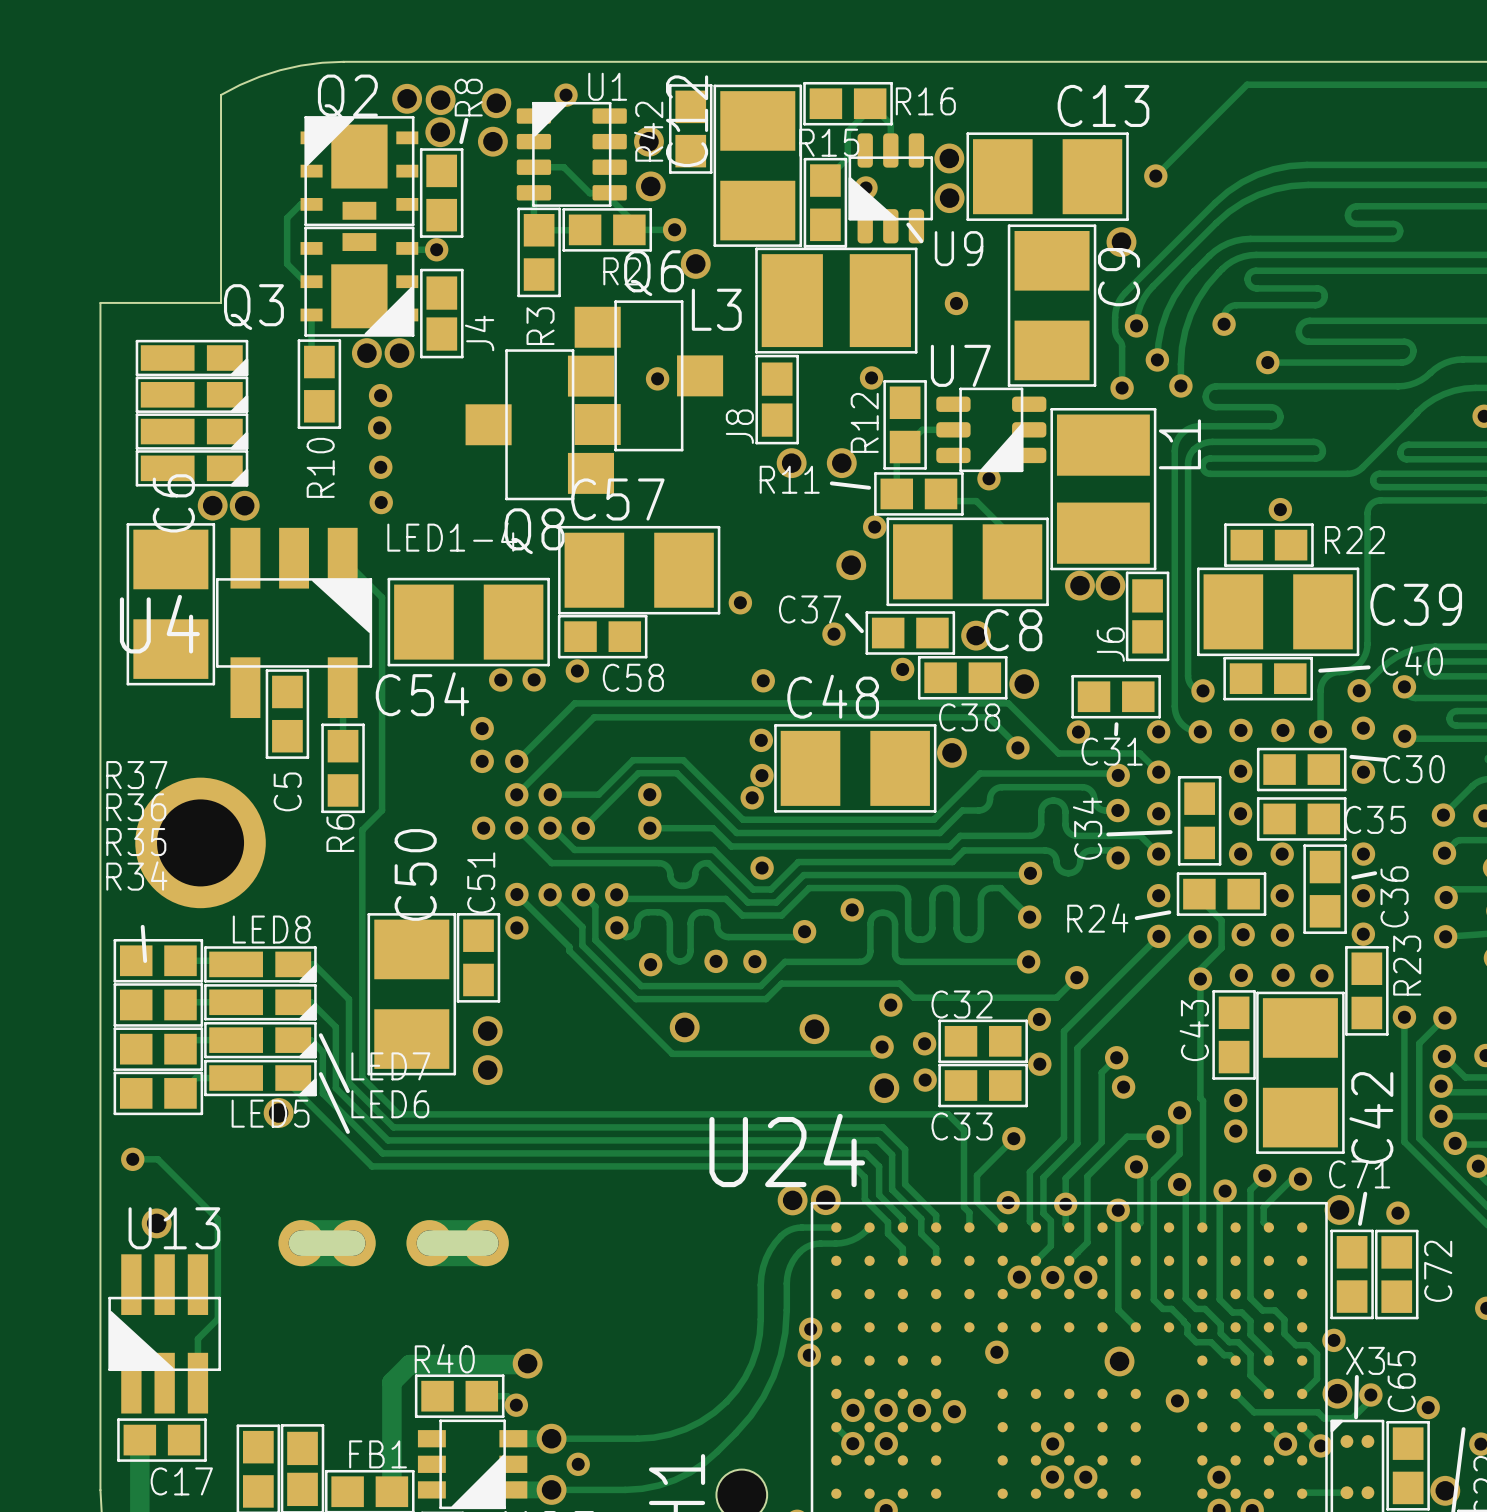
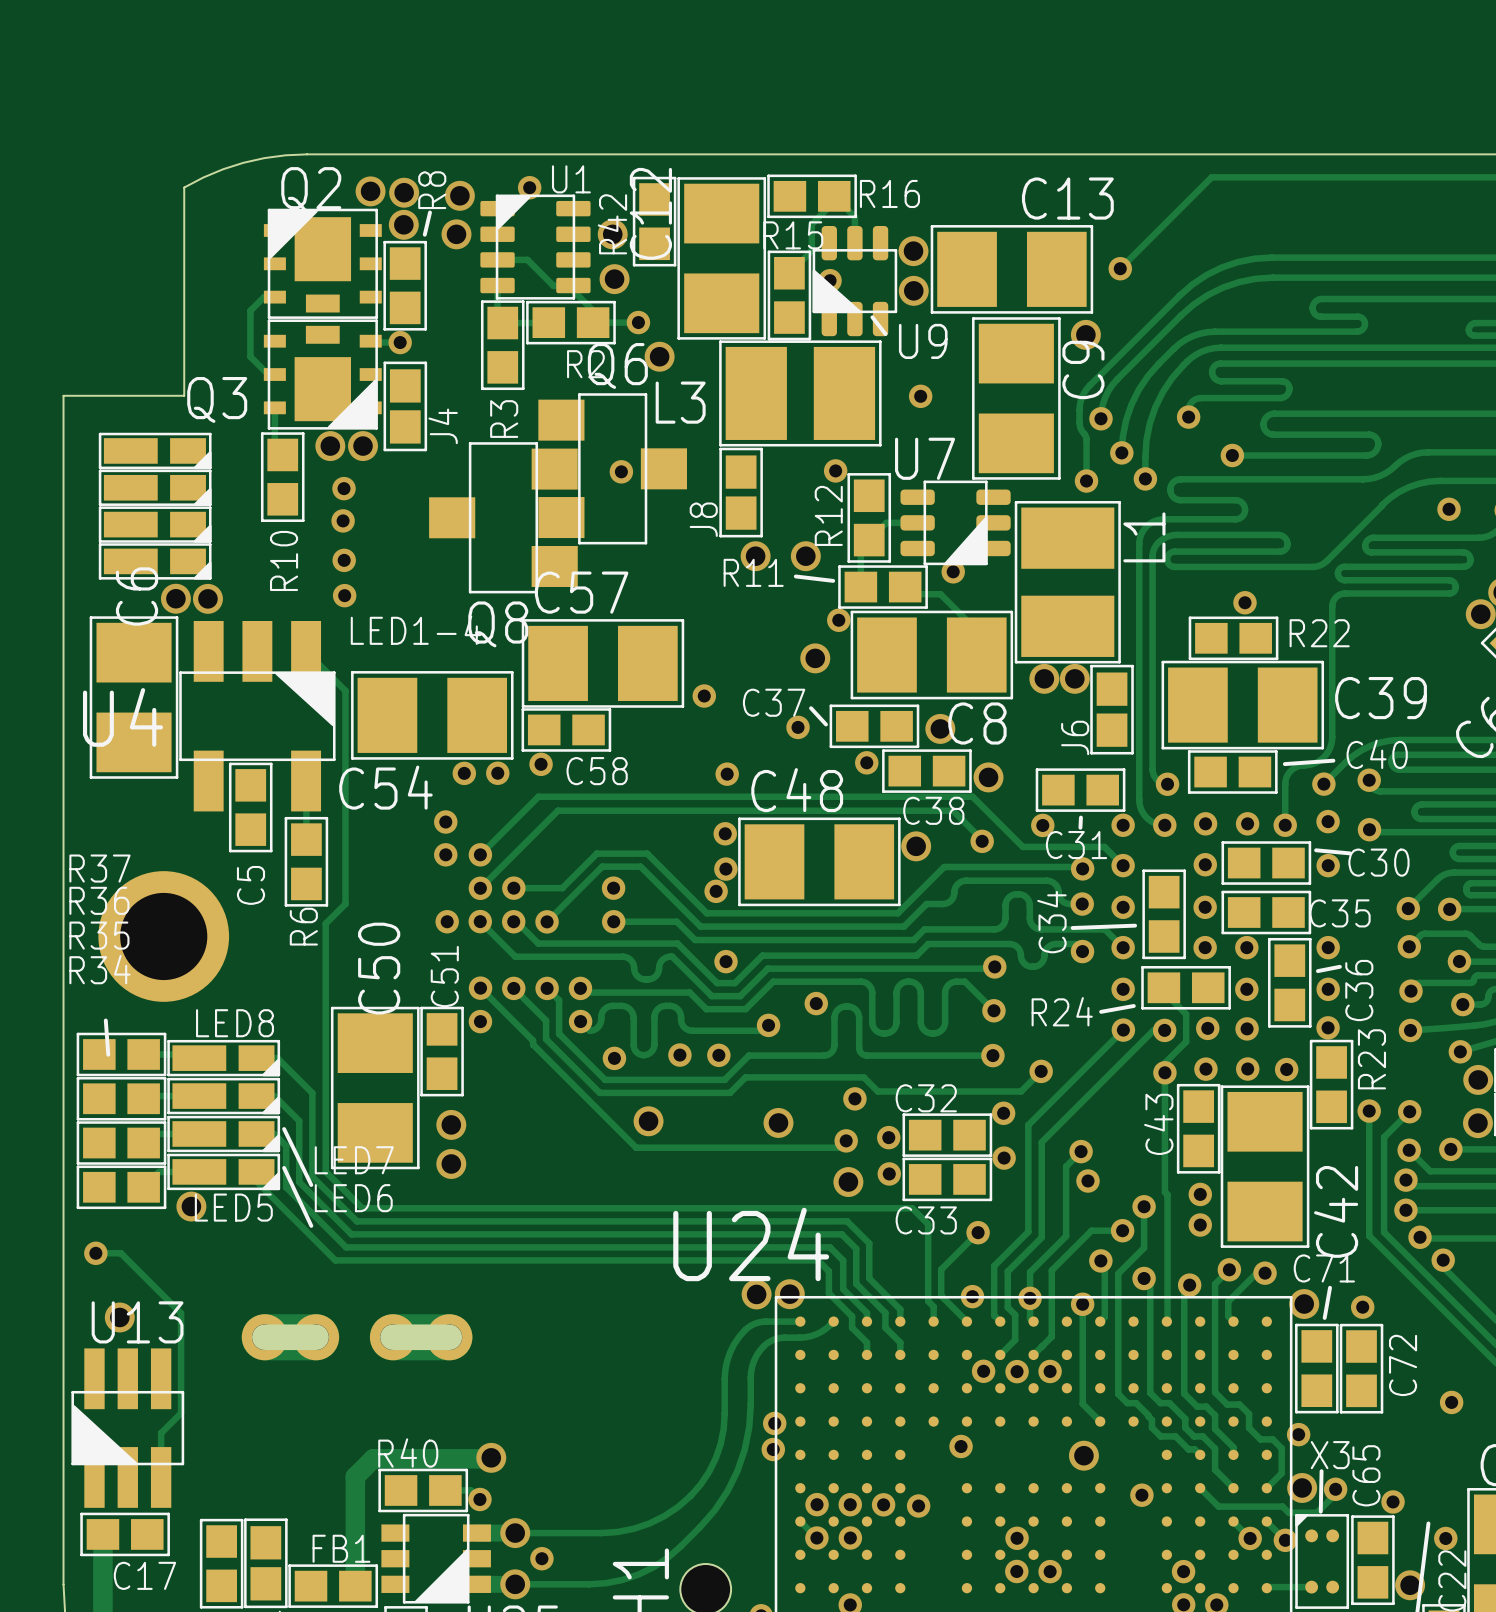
via position: (278, 1113) -> (191, 1206)

